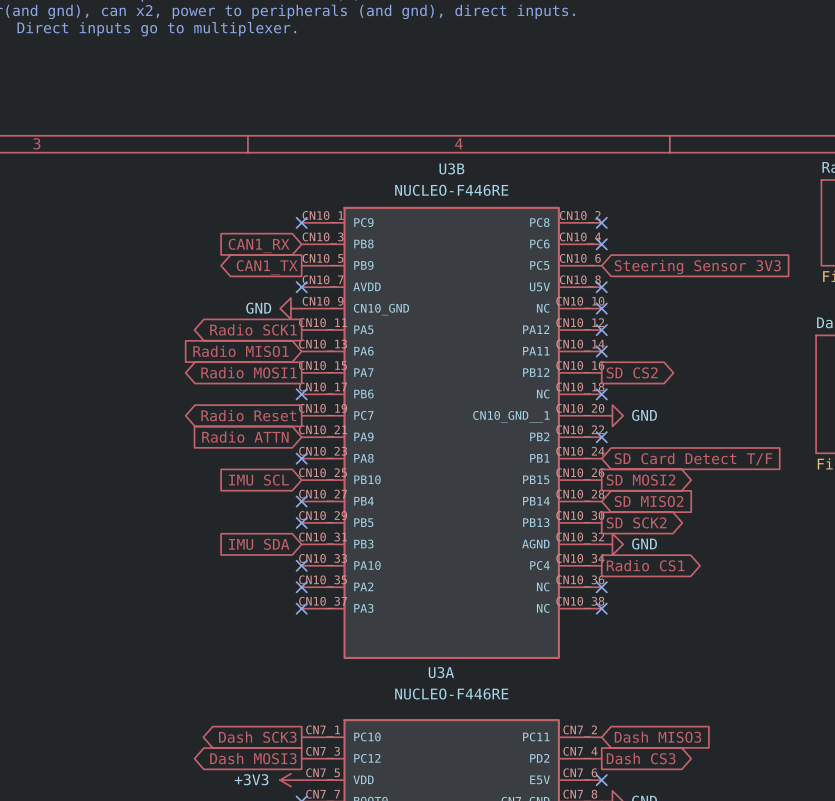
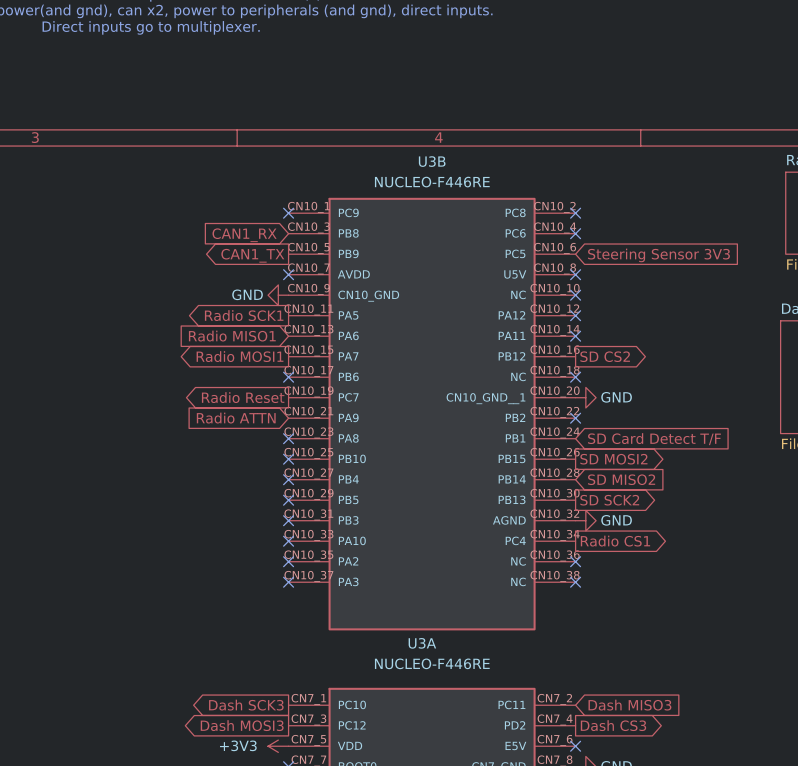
global label: IMU SCL (259, 480) -> none
no-connect mark: none -> (288, 459)
global label: IMU SDA (259, 544) -> none
no-connect mark: none -> (288, 520)

